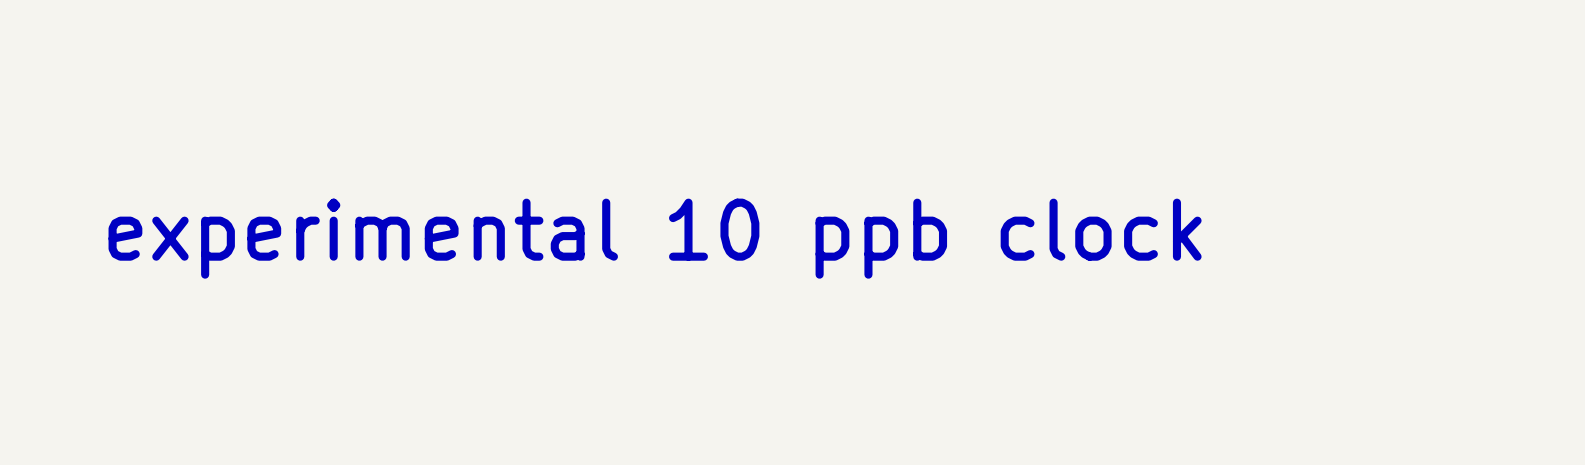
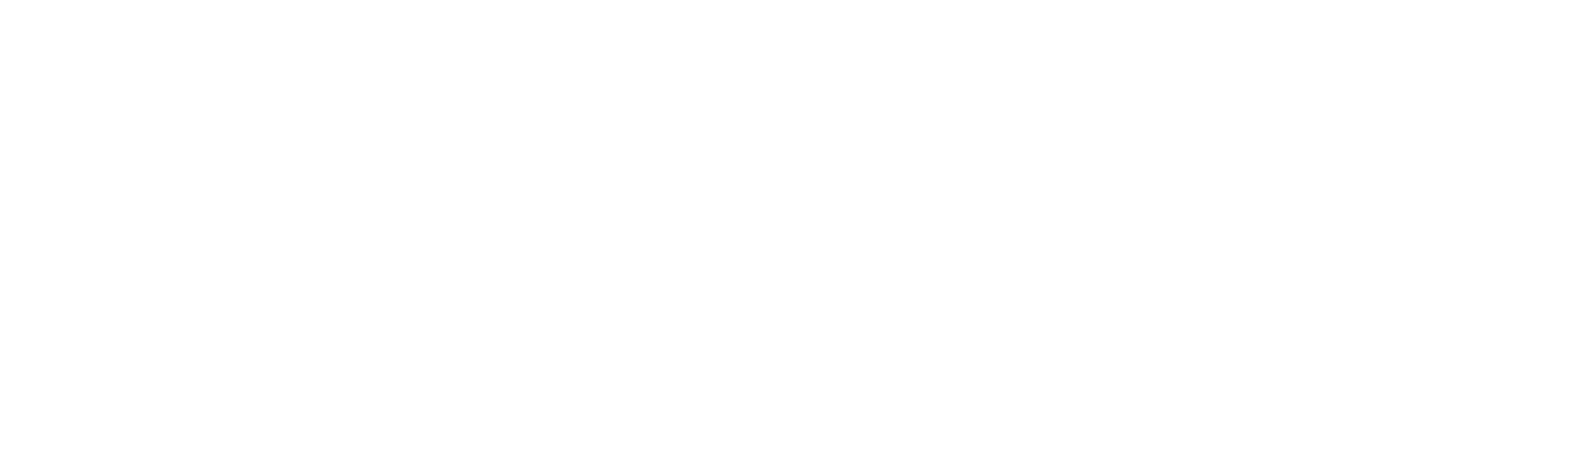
text: experimental 10 ppb clock (655, 238) -> none

